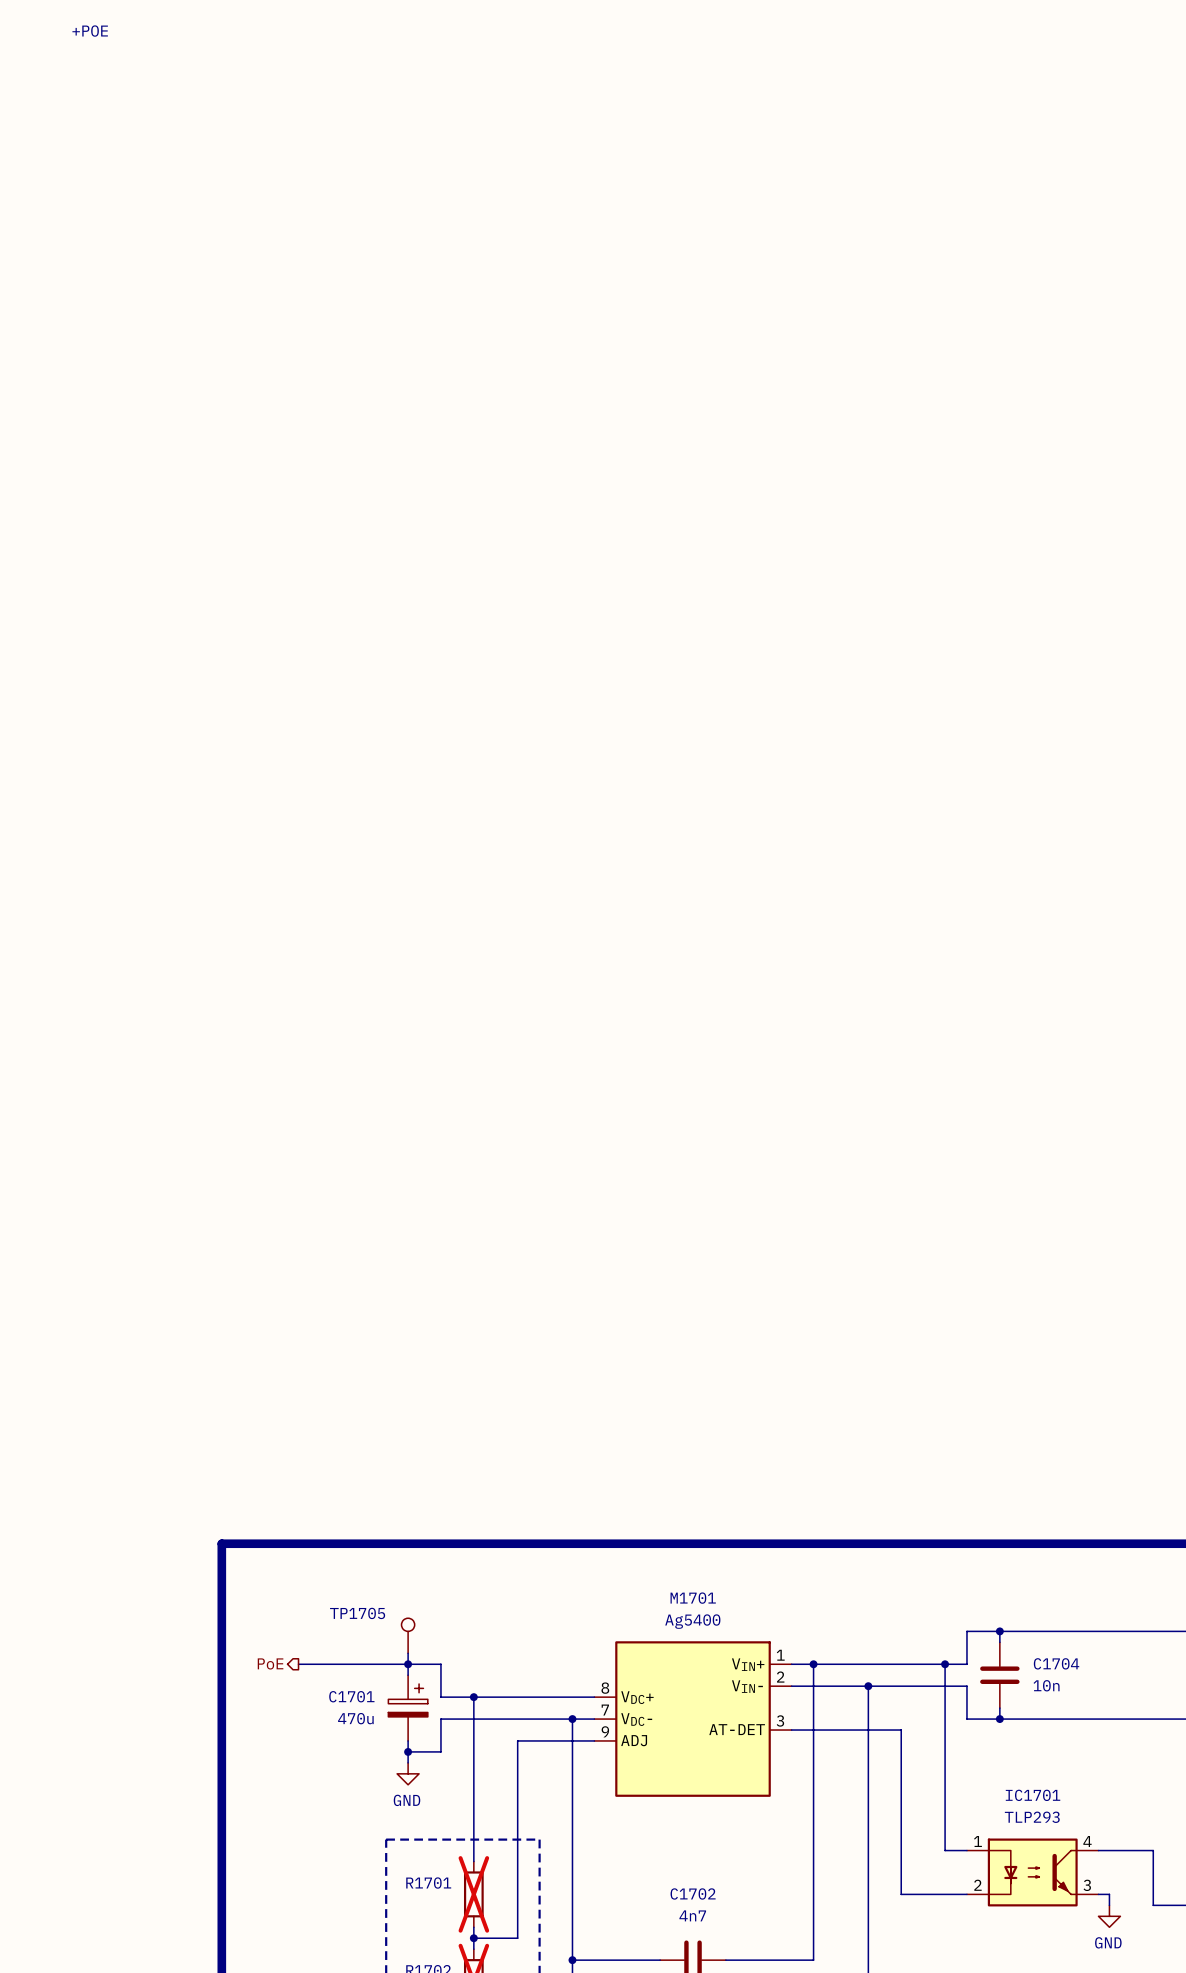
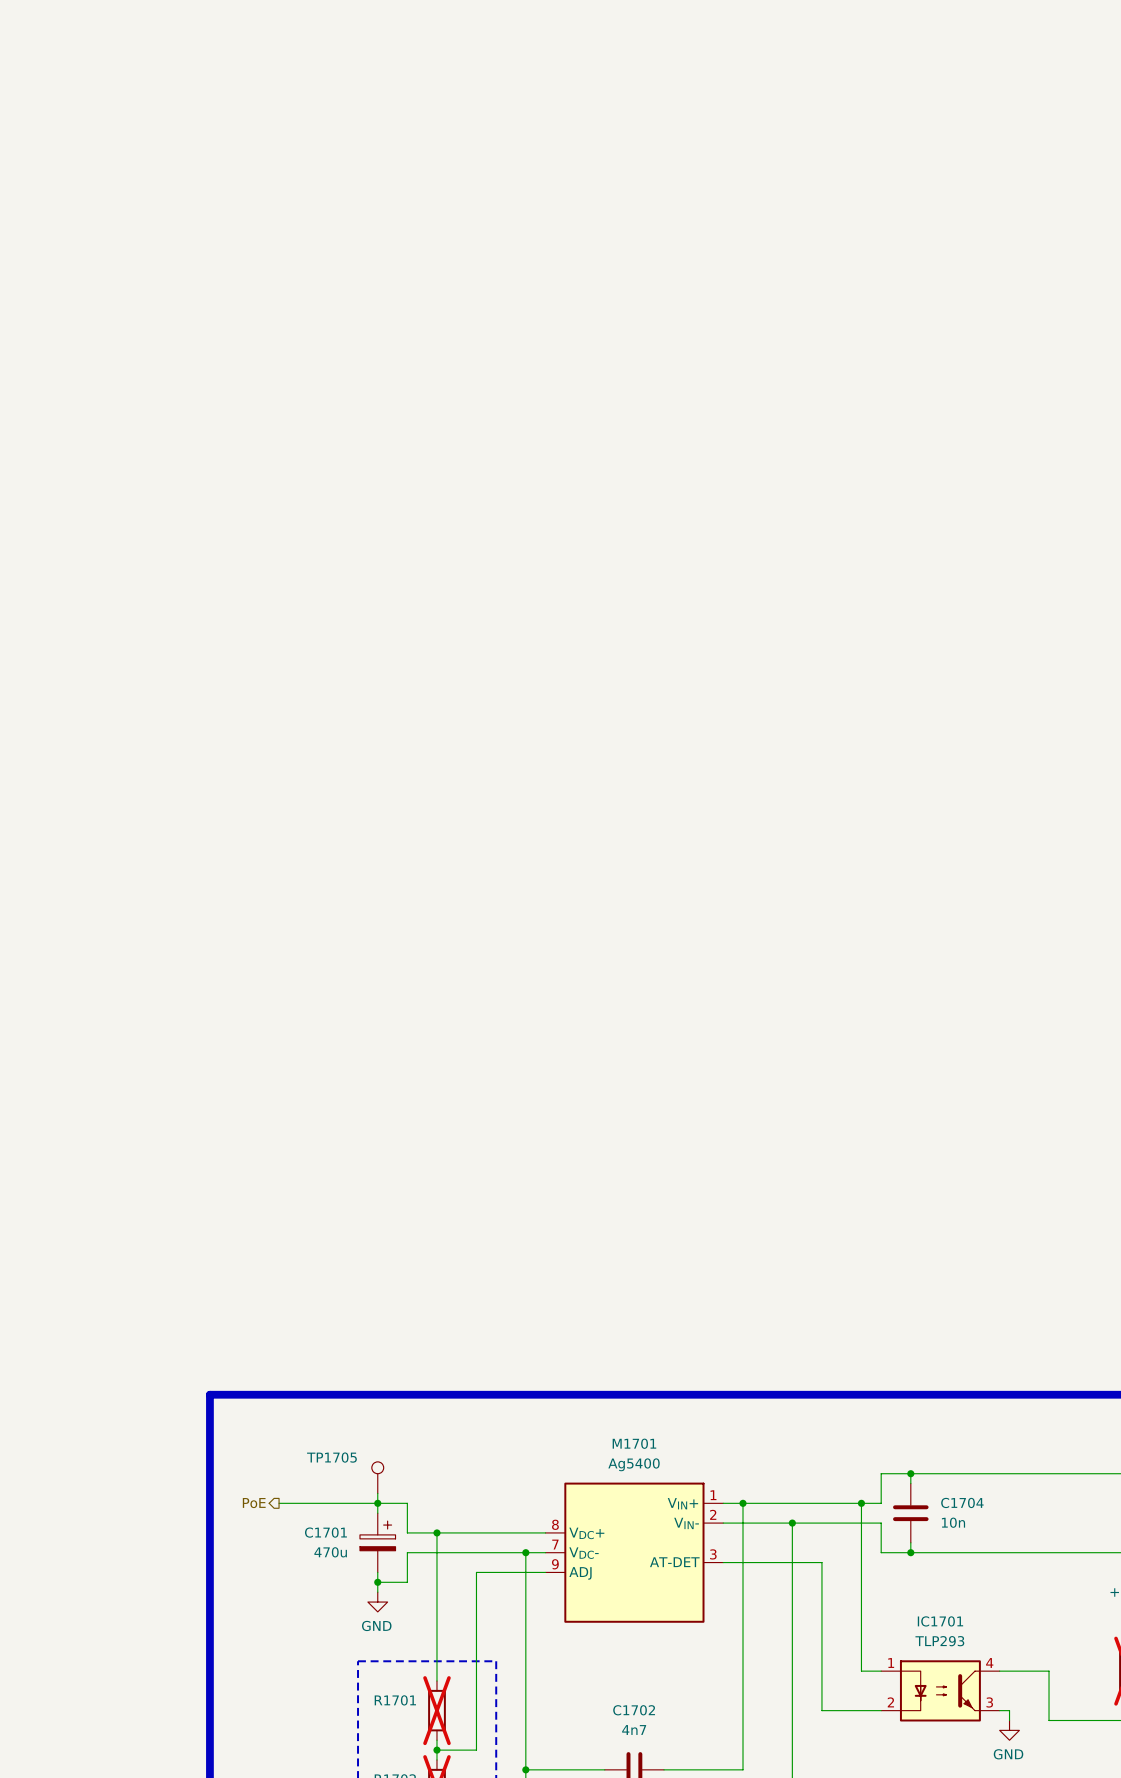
C1704 text: +POE (90, 31) -> none

